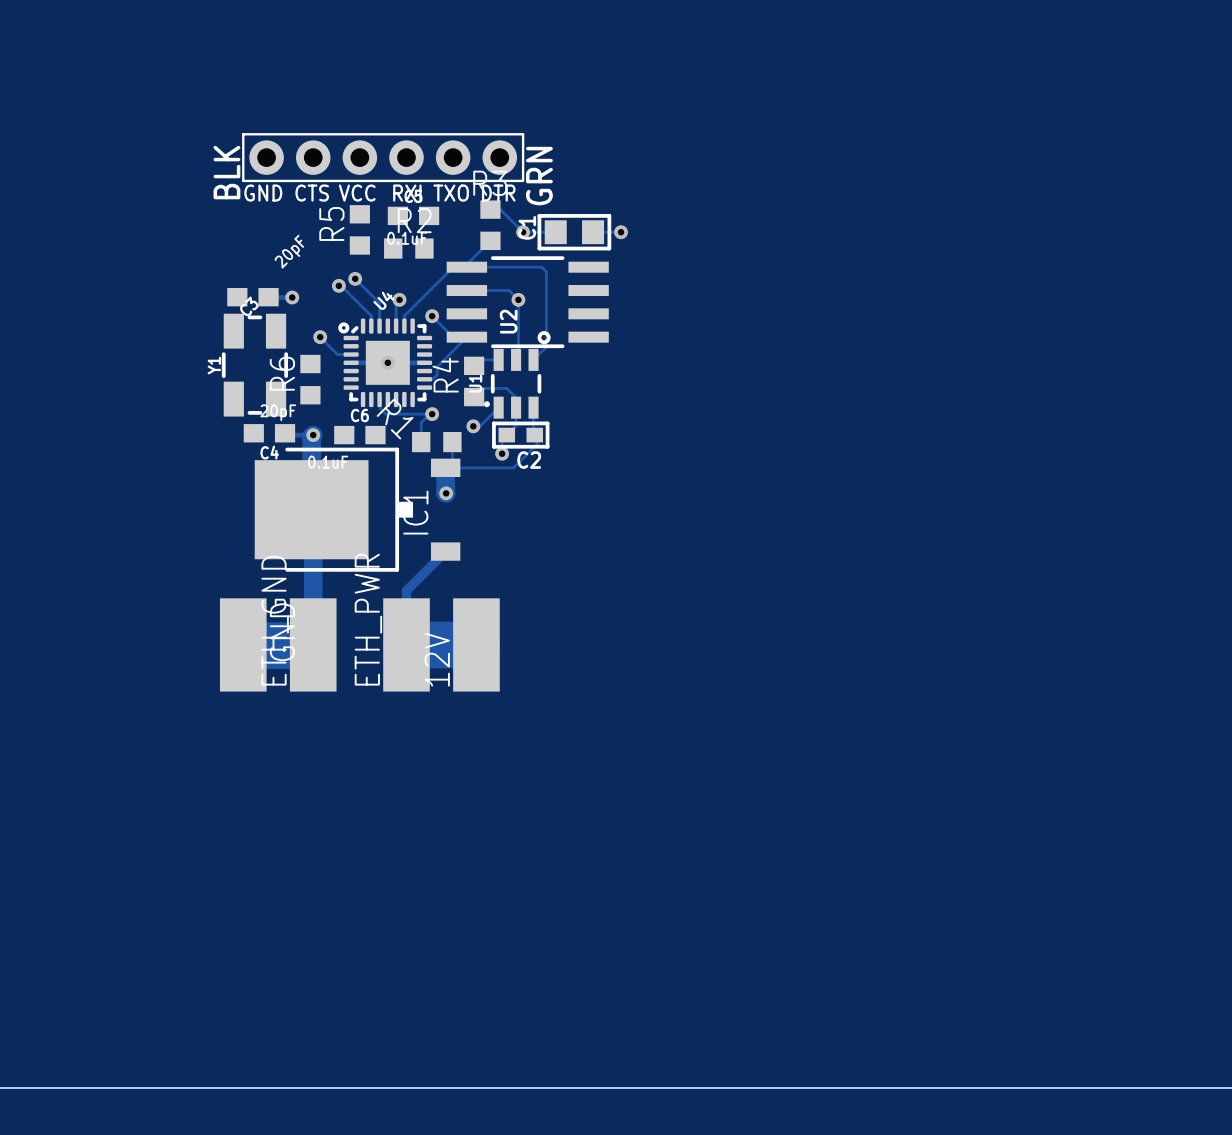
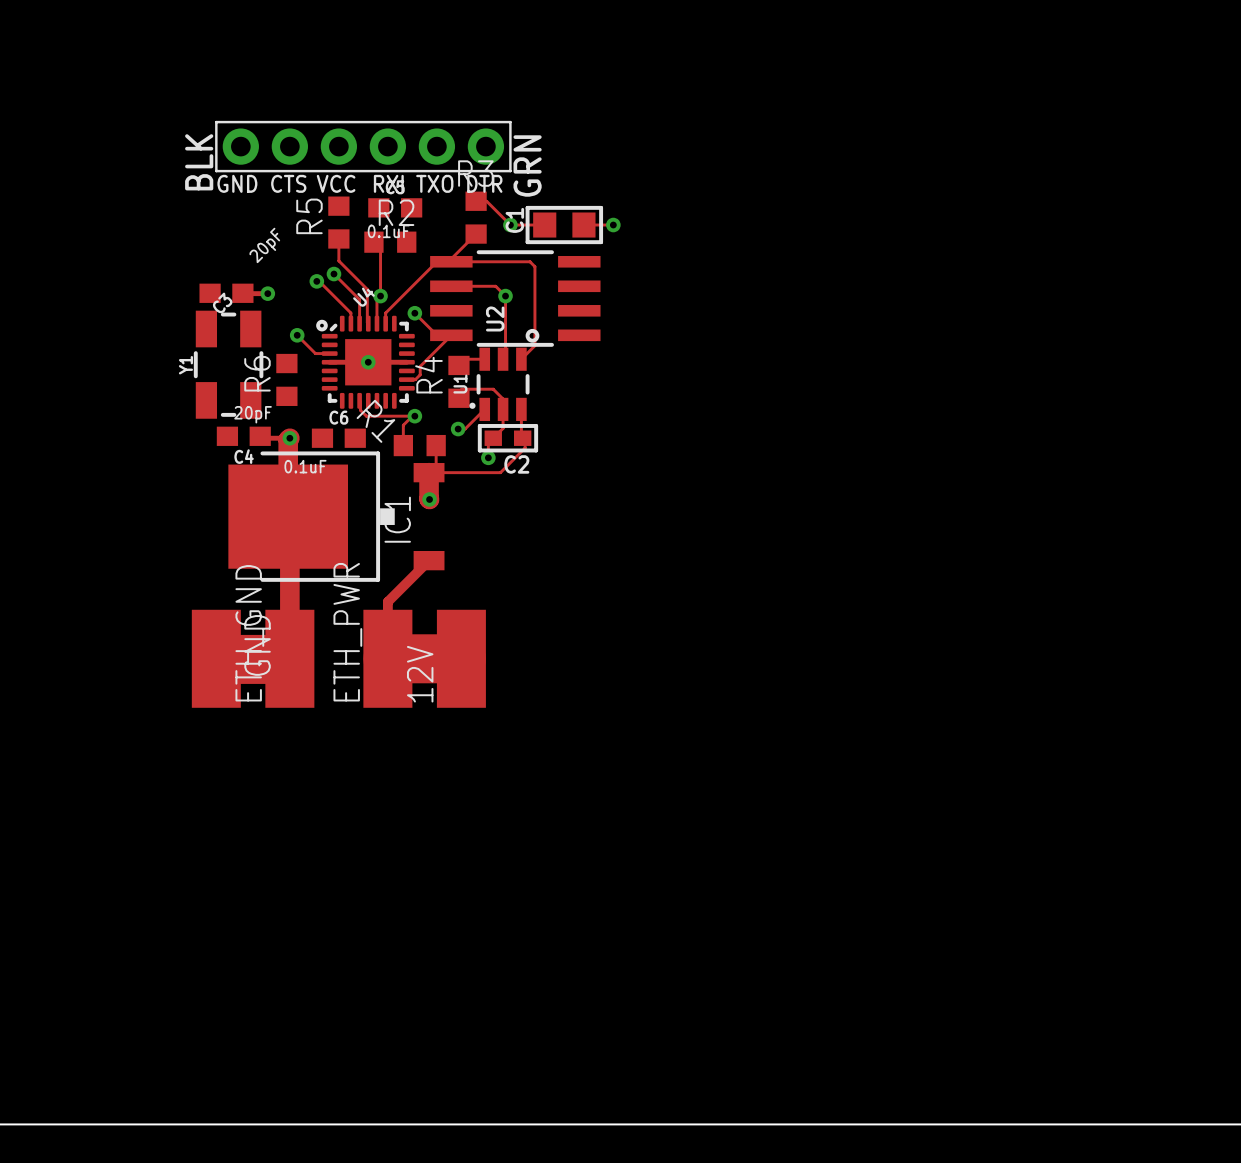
track: none -> (338, 238) (338, 260) (367, 289) (368, 323)
track: none -> (373, 242) (380, 248) (380, 296)

